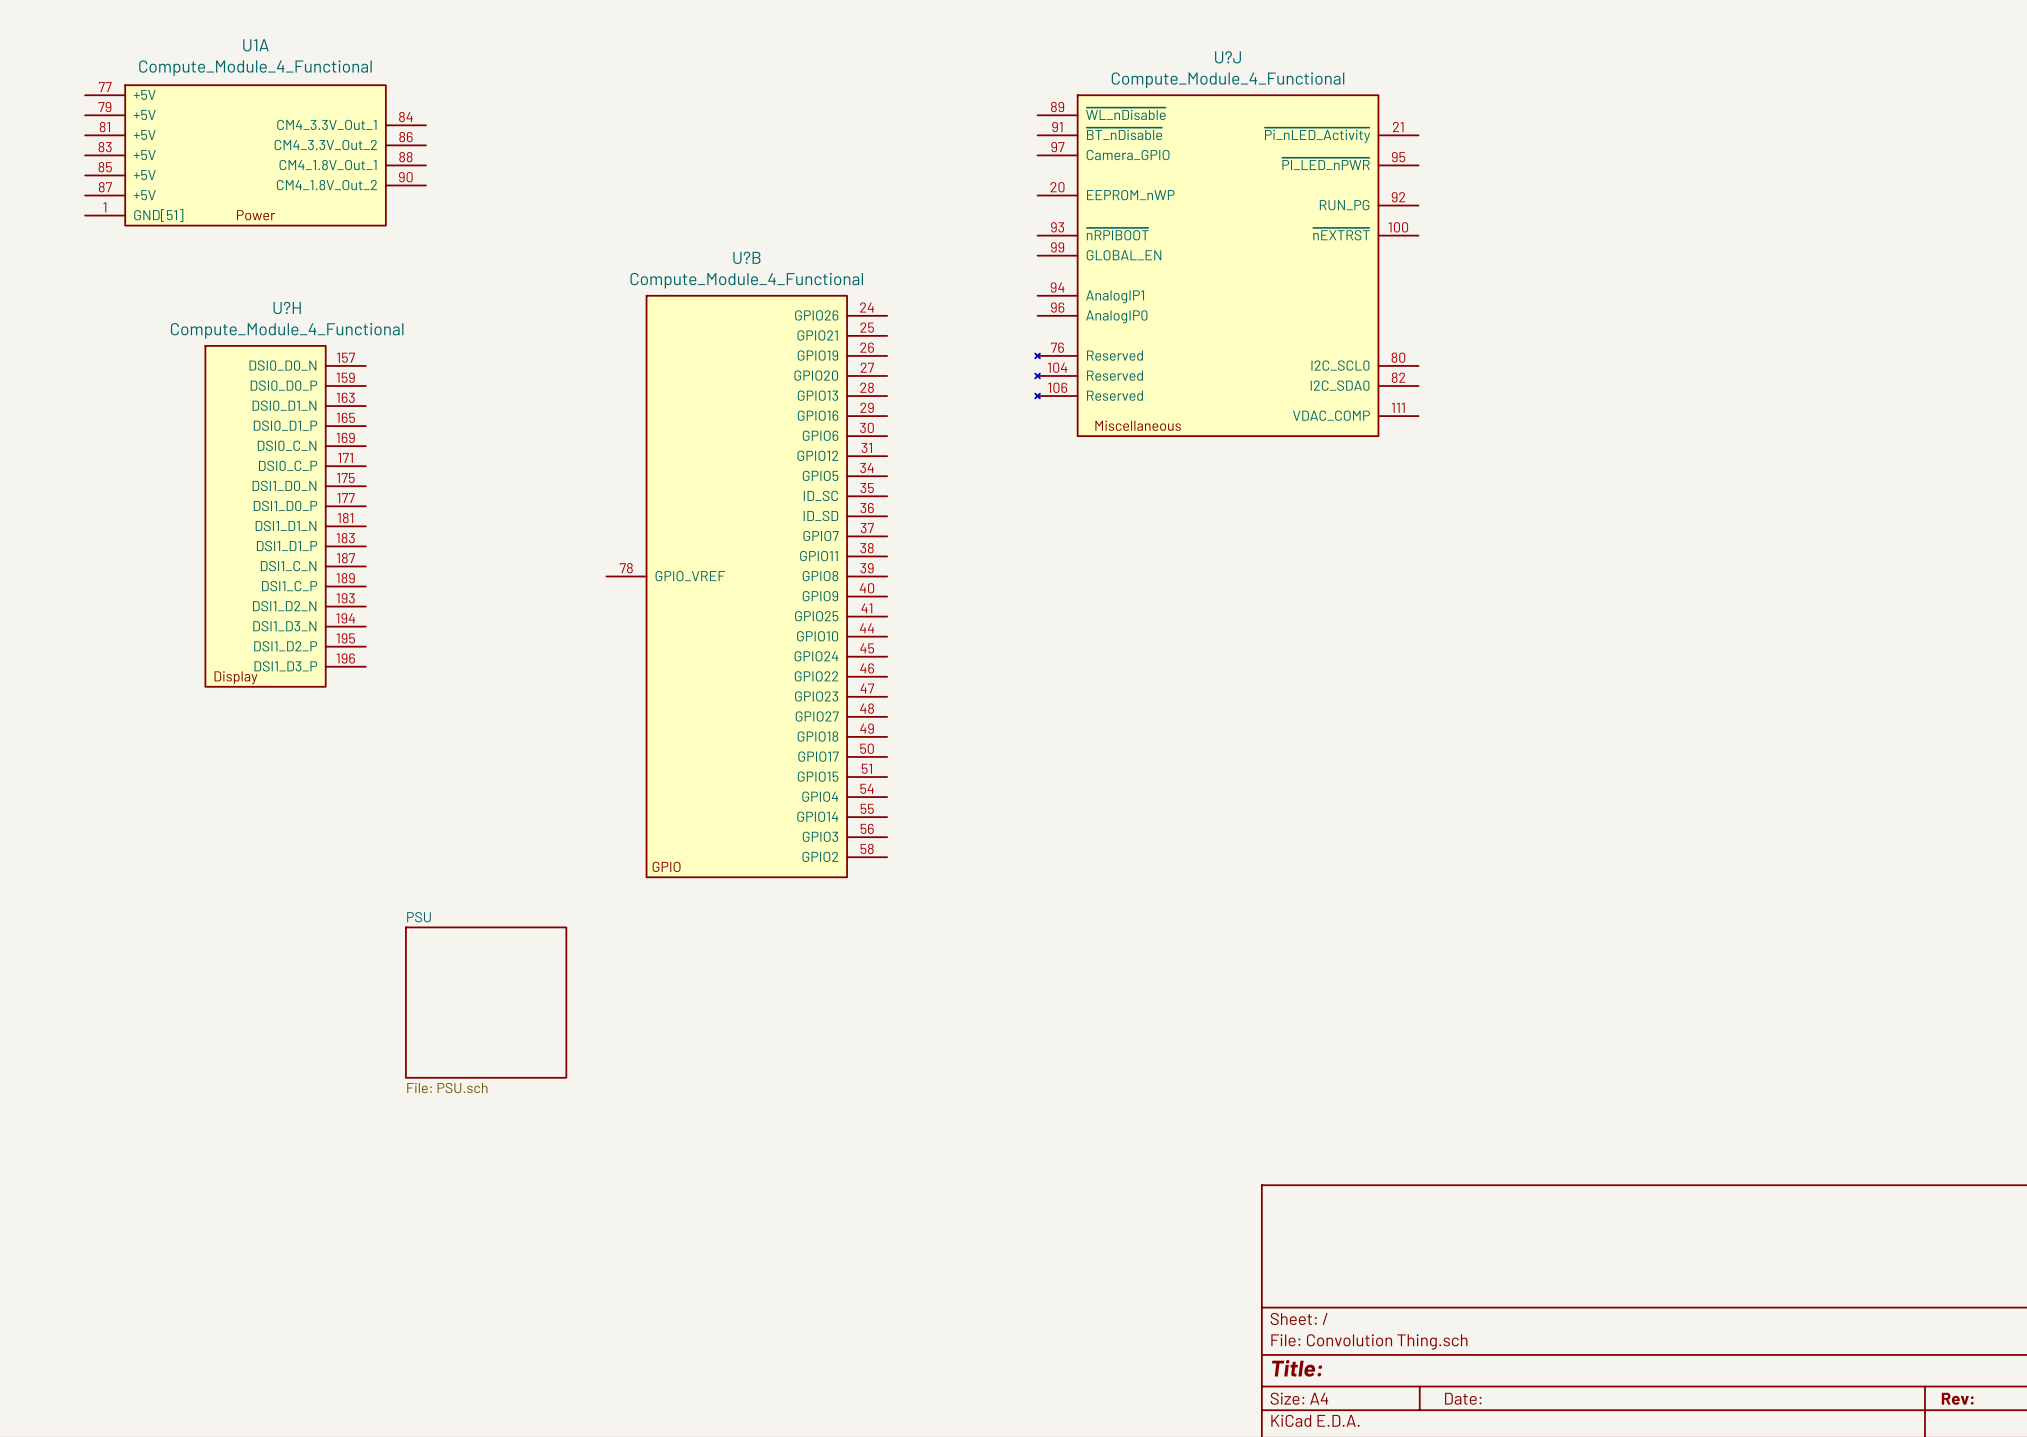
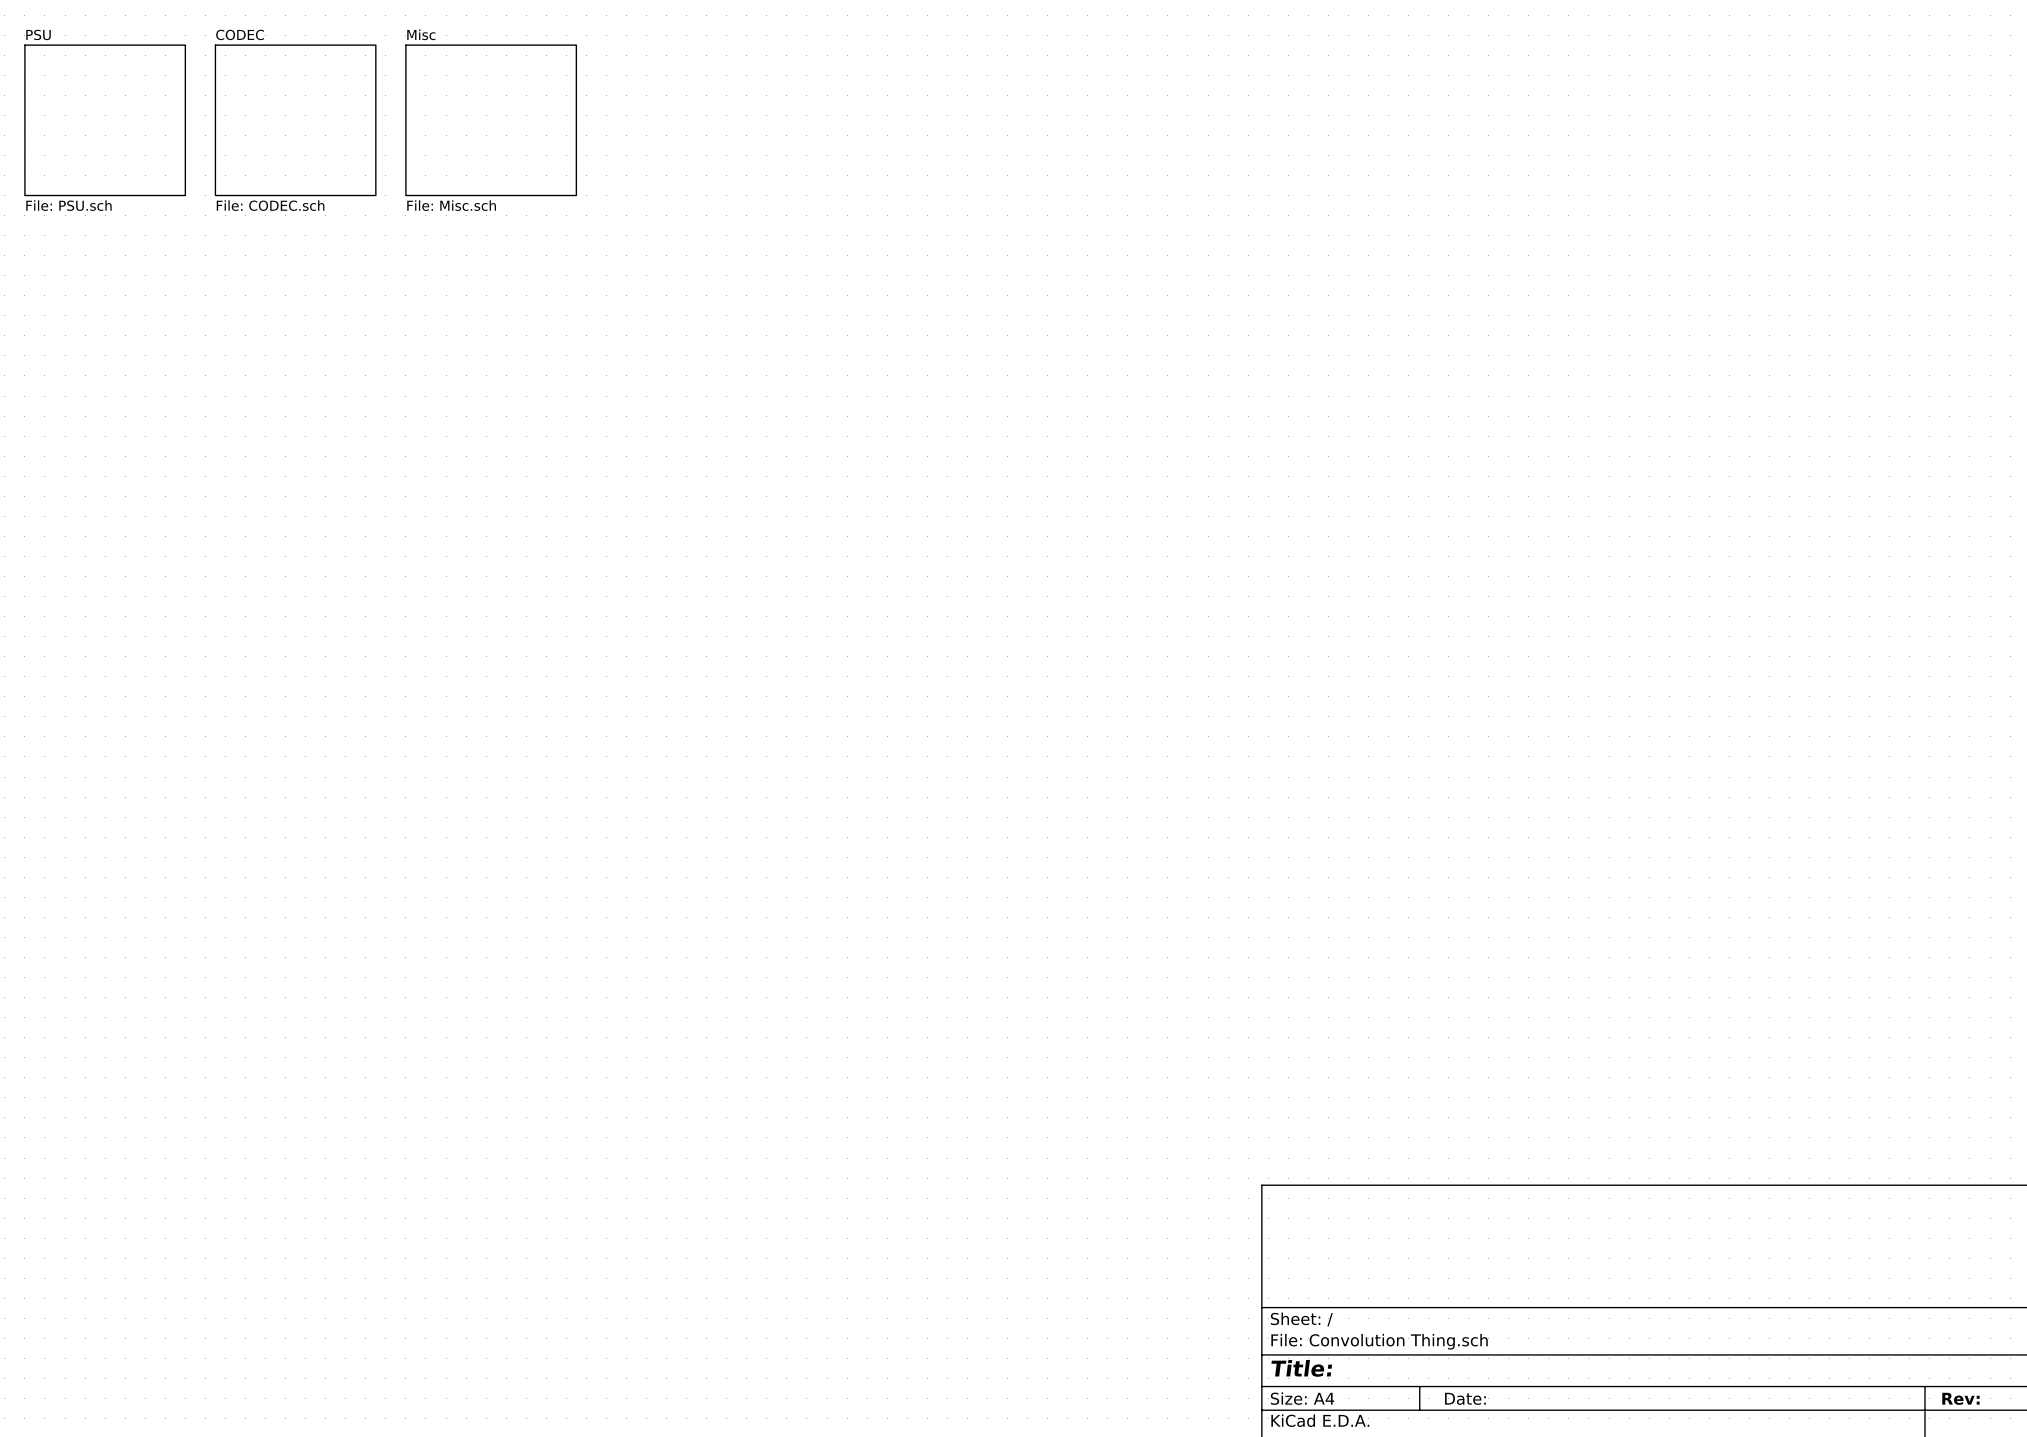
sheet PSU: none -> File: PSU.sch (105, 120)
sheet CODEC: none -> File: CODEC.sch (295, 120)
sheet Misc: none -> File: Misc.sch (491, 120)
U1A: Compute_Module_4_Functional (255, 155) -> none
U?J: Compute_Module_4_Functional (1226, 265) -> none
U?H: Compute_Module_4_Functional (285, 516) -> none
U?B: Compute_Module_4_Functional (746, 586) -> none
sheet PSU: File: PSU.sch (486, 1002) -> none

